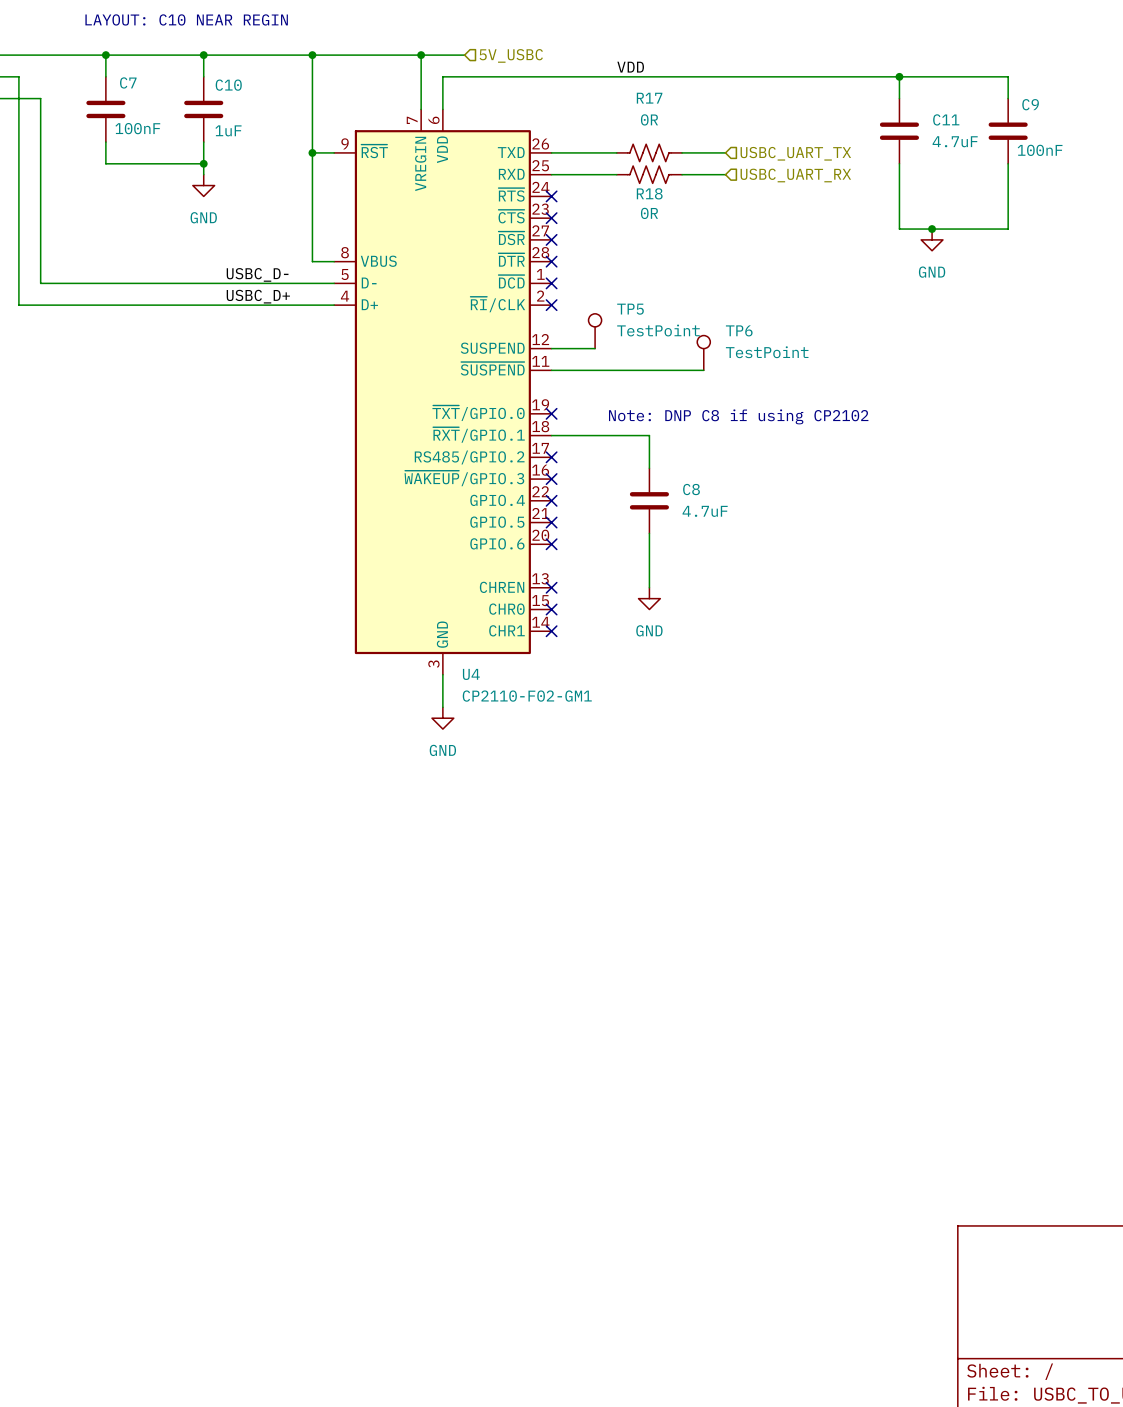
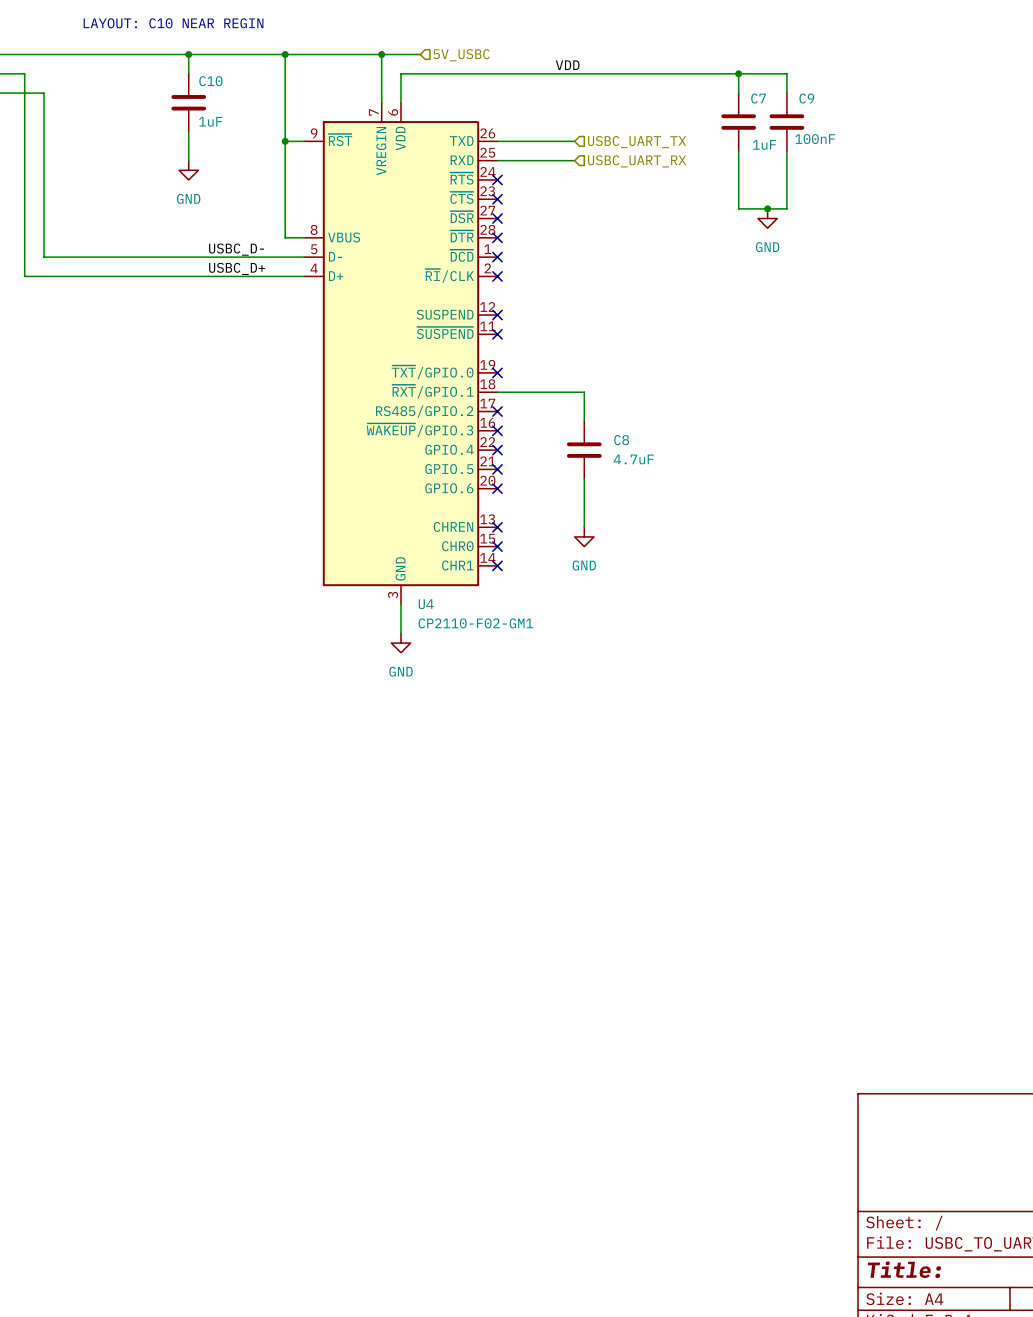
wire: (105, 55) (105, 76) -> none
junction: (105, 55) -> none
junction: none -> (738, 73)
wire: (877, 76) (1008, 76) (1008, 98) -> (786, 73) (786, 93)
wire: (899, 76) (899, 98) -> (738, 73) (738, 93)
junction: (899, 76) -> none
C7 position: (105, 109) -> (738, 122)
C7 value: 100nF (137, 128) -> 1uF (764, 144)
C11: 4.7uF (899, 131) -> none
C9 position: (1008, 131) -> (786, 122)
wire: (105, 142) (105, 163) (203, 163) -> none
R17: 0R (649, 152) -> none
wire: (682, 152) (725, 152) -> none
hierarchical label position: USBC_UART_TX (795, 153) -> USBC_UART_TX (637, 142)
junction: (203, 163) -> none
wire: none -> (738, 151) (738, 208) (786, 208) (786, 151)
wire: (899, 163) (899, 229) (1008, 229) (1008, 163) -> none
R18: 0R (649, 174) -> none
wire: (682, 174) (725, 174) -> none
hierarchical label position: USBC_UART_RX (795, 175) -> USBC_UART_RX (637, 161)
junction: none -> (767, 208)
junction: (932, 229) -> none
power symbol position: GND (932, 239) -> GND (767, 218)
TP5: TestPoint (595, 331) -> none
wire: (551, 348) (595, 348) -> none
no-connect mark: none -> (497, 315)
TP6: TestPoint (703, 352) -> none
wire: (551, 370) (703, 370) -> none
no-connect mark: none -> (497, 334)
text: Note: DNP C8 if using CP2102 (738, 416) -> none

